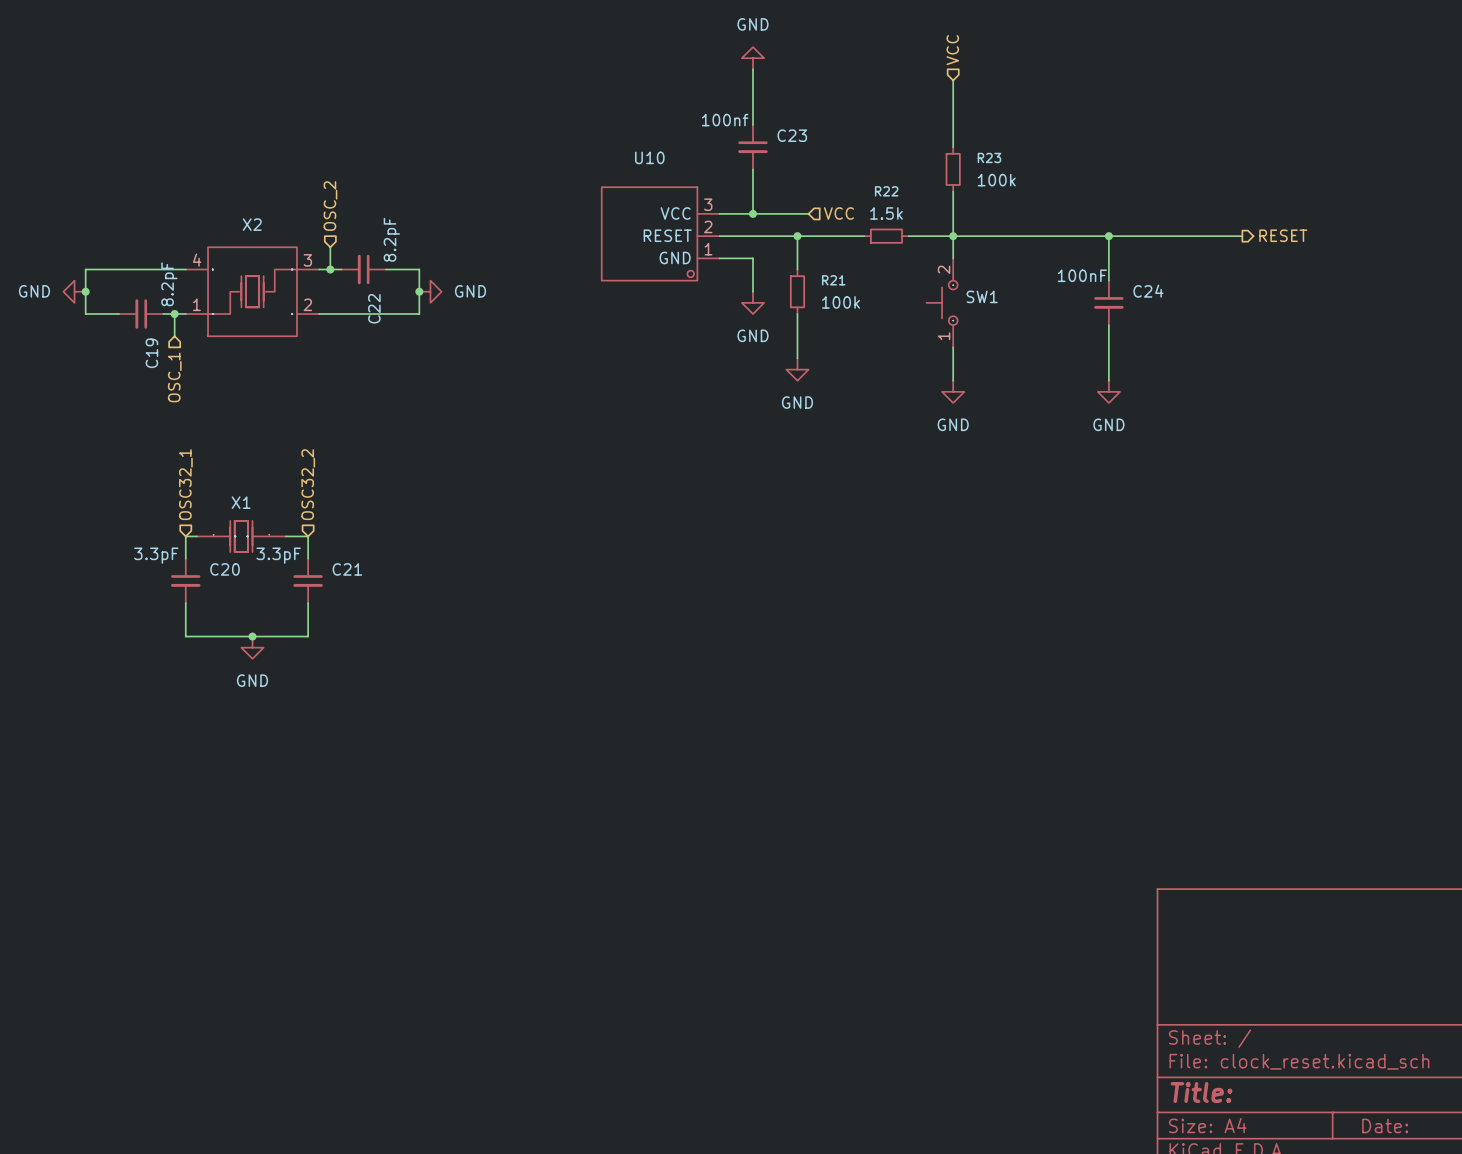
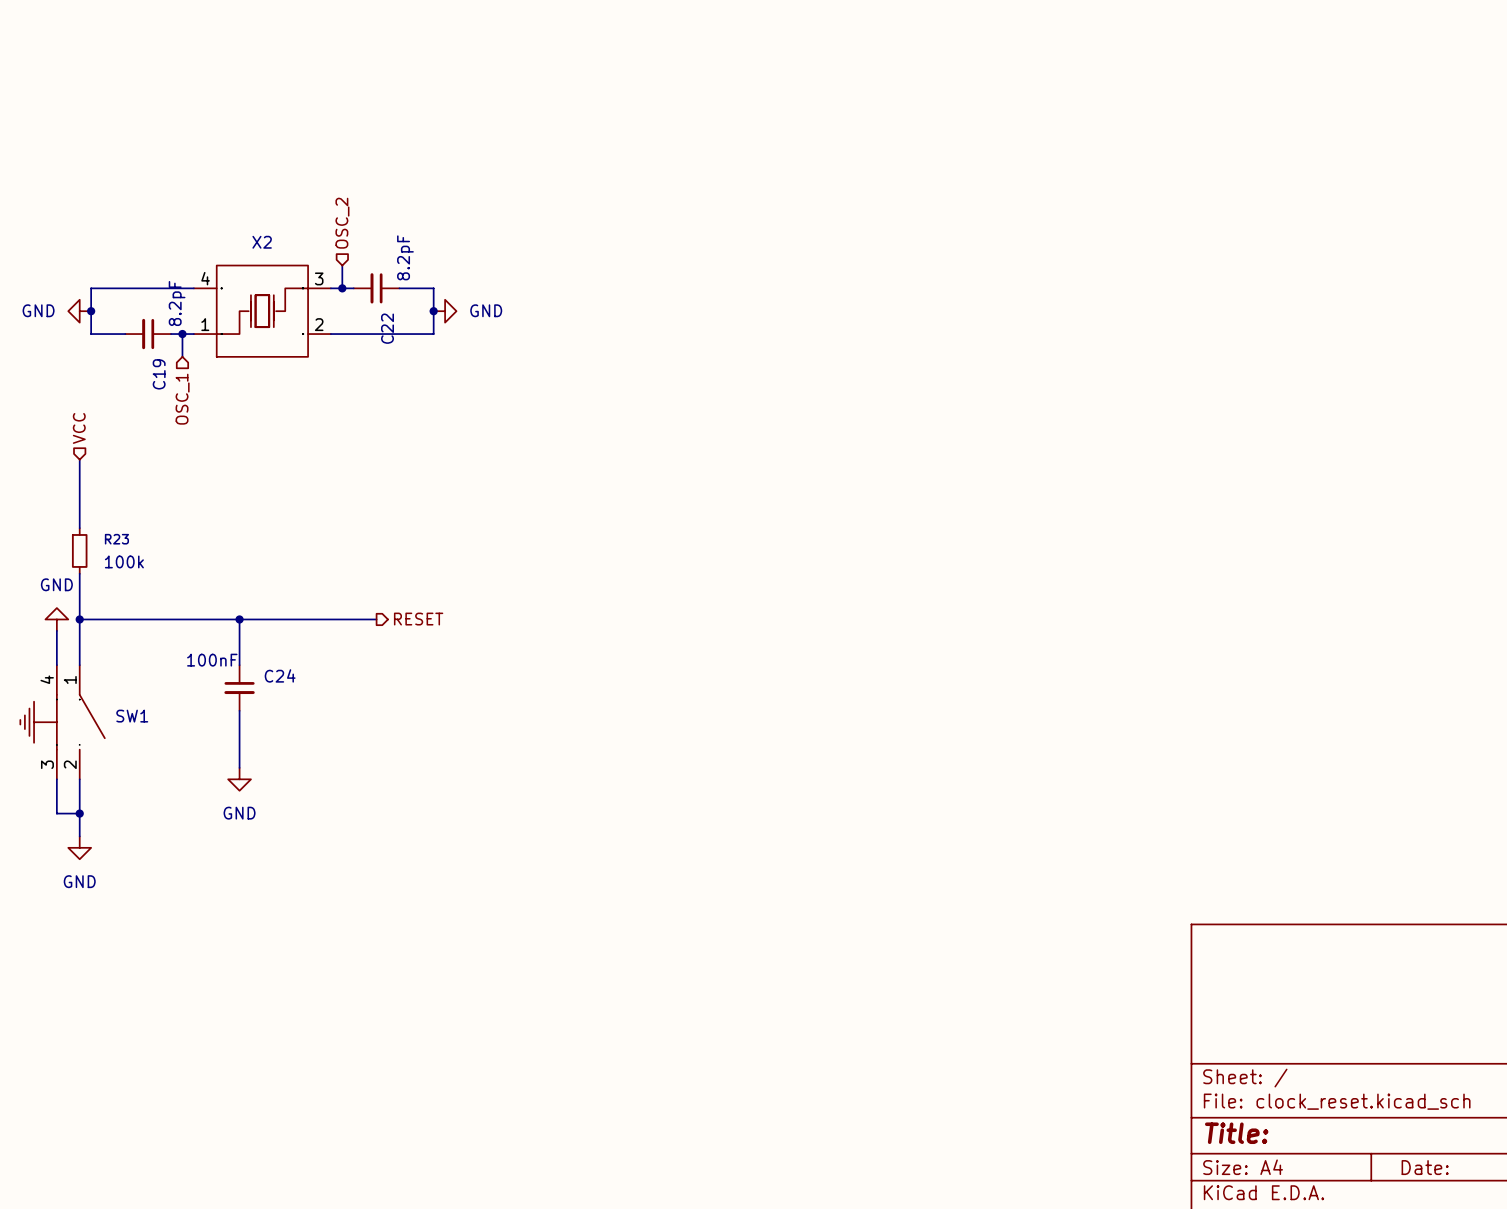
hierarchical label: VCC (952, 50) -> none
power symbol: GND (752, 58) -> none
wire: (752, 69) (752, 124) -> none
wire: (953, 80) (953, 147) -> none
C23: 100nf (752, 147) -> none
wire: (752, 169) (752, 213) -> none
R23 position: (953, 169) -> (79, 550)
wire: (953, 191) (953, 258) -> none
wire: (719, 213) (808, 213) -> none
junction: (752, 213) -> none
hierarchical label: VCC (838, 213) -> none
U10: (660, 233) -> none
hierarchical label: RESET (1283, 235) -> none
wire: (719, 236) (864, 236) -> none
wire: (797, 236) (797, 269) -> none
junction: (797, 236) -> none
R22: 1.5k (886, 236) -> none
wire: (908, 236) (1242, 236) -> none
junction: (953, 236) -> none
wire: (1108, 236) (1108, 280) -> none
junction: (1108, 236) -> none
wire: (719, 258) (752, 258) (752, 291) -> none
SW1 symbol: [926, 258, 958, 348] -> [20, 665, 105, 780]
R21: 100k (797, 291) -> none
SW1 name position: SW1 (982, 296) -> SW1 (132, 716)
power symbol: GND (752, 302) -> none
C24 position: (1108, 302) -> (239, 687)
wire: (797, 314) (797, 358) -> none
wire: (1108, 325) (1108, 380) -> none
wire: (953, 347) (953, 380) -> none
power symbol: GND (797, 369) -> none
power symbol: GND (953, 391) -> none
power symbol: GND (1108, 391) -> none
hierarchical label: none -> VCC (79, 428)
wire: none -> (79, 459) (79, 528)
hierarchical label: OSC32_1 (185, 484) -> none
hierarchical label: OSC32_2 (308, 484) -> none
wire: (196, 536) (185, 536) (185, 558) -> none
X1: (241, 536) -> none
wire: (285, 536) (308, 536) (308, 558) -> none
wire: none -> (79, 573) (79, 665)
C20: 3.3pF (185, 580) -> none
C21: 3.3pF (308, 580) -> none
hierarchical label: none -> RESET (418, 619)
power symbol: none -> GND (56, 619)
wire: none -> (79, 619) (376, 619)
junction: none -> (79, 619)
wire: none -> (239, 619) (239, 665)
wire: none -> (56, 630) (56, 665)
wire: (185, 603) (185, 636) (308, 636) (308, 603) -> none
junction position: (252, 636) -> (239, 619)
power symbol position: GND (252, 647) -> GND (239, 779)
wire: none -> (239, 710) (239, 767)
wire: none -> (56, 779) (56, 813) (79, 813)
wire: none -> (79, 779) (79, 836)
junction: none -> (79, 813)
power symbol: none -> GND (79, 847)

